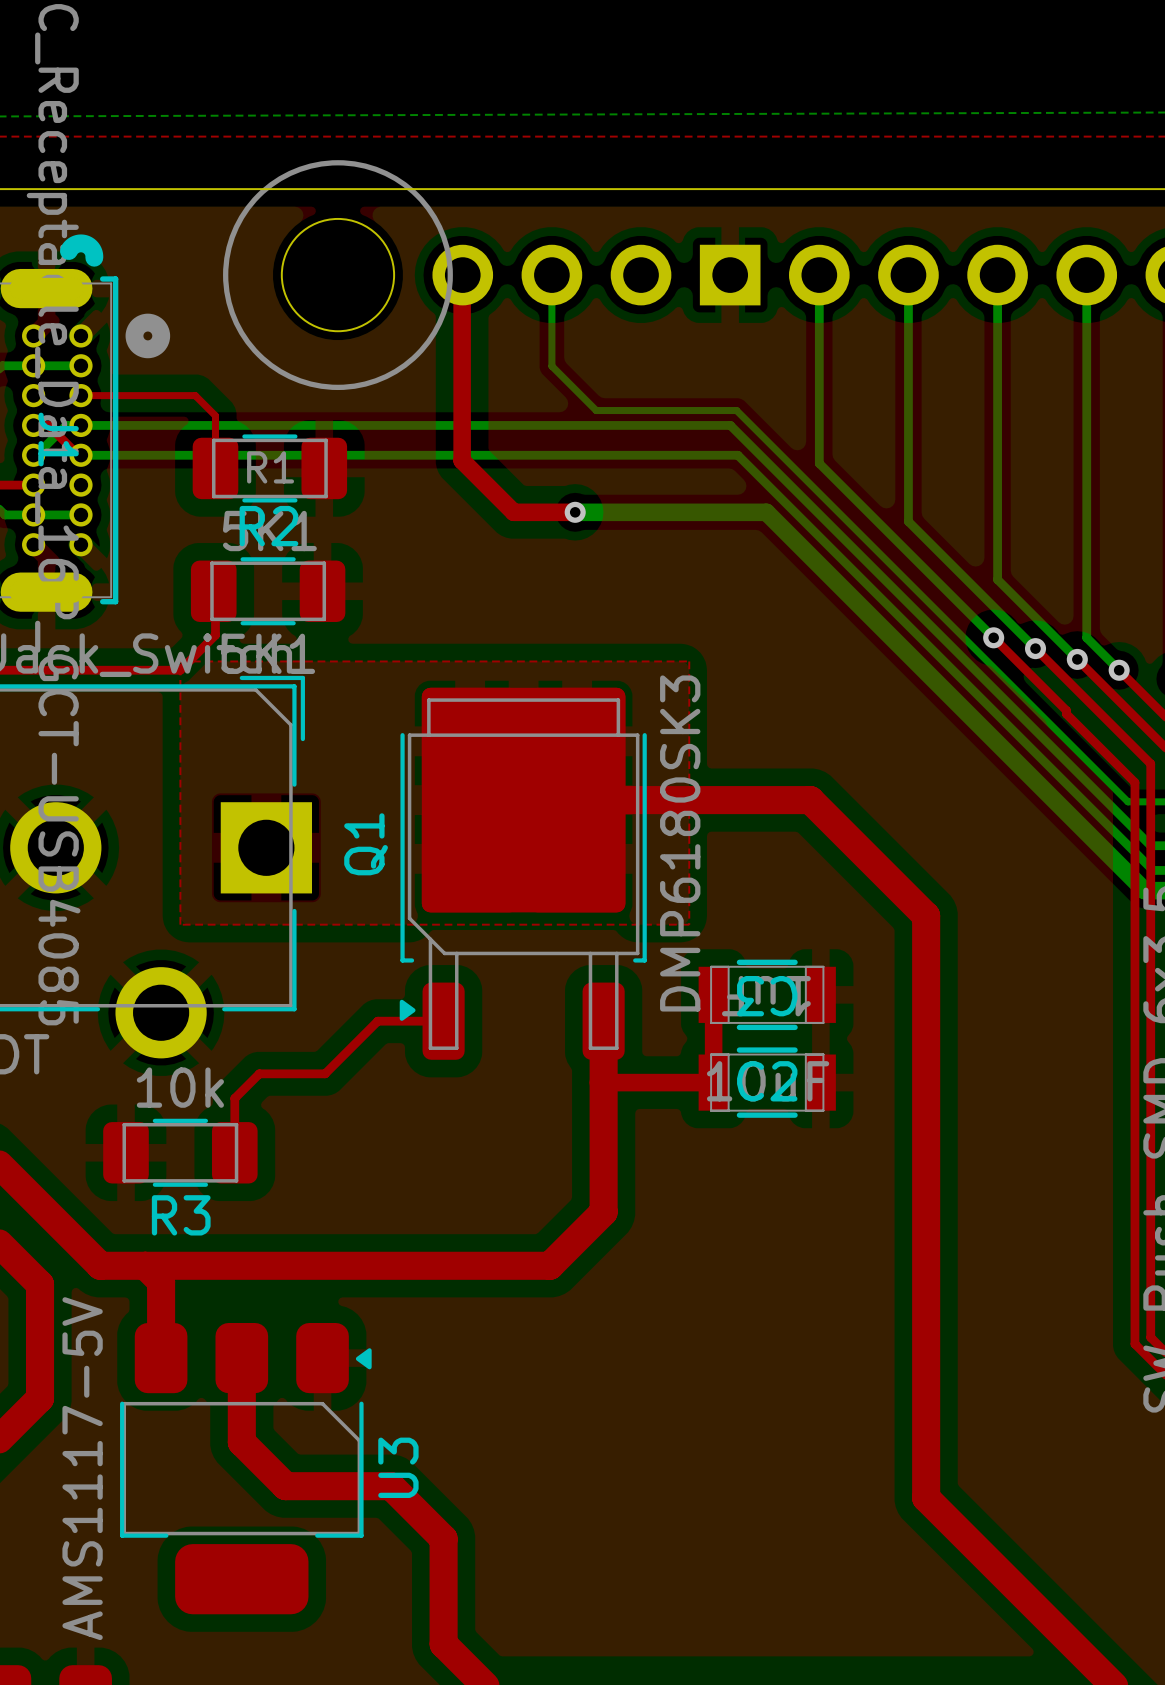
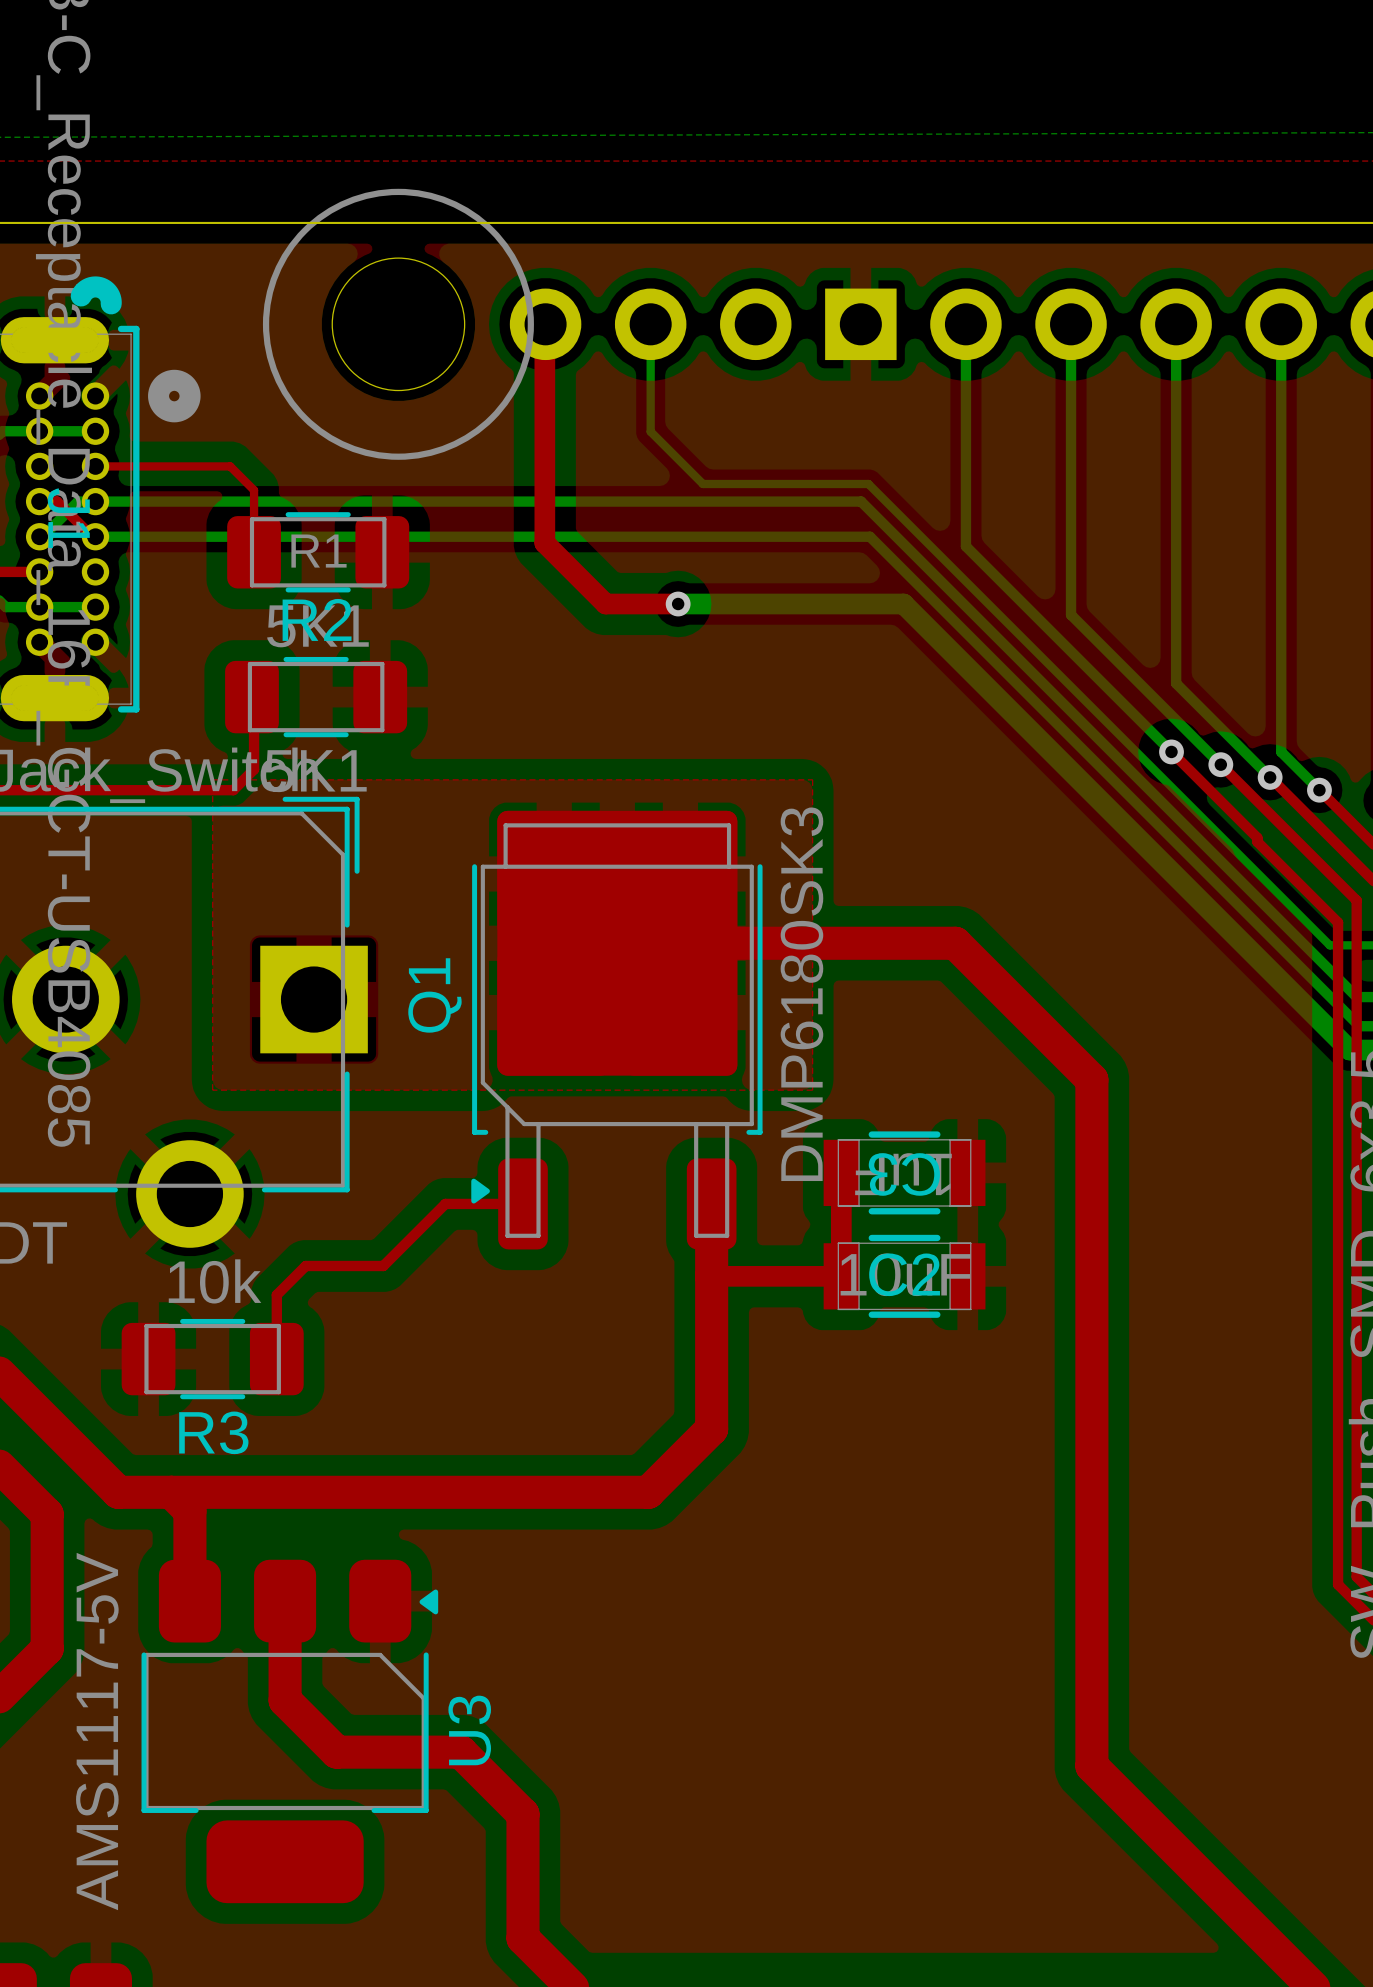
top track: (215, 635) (180, 670) -> (254, 748) (254, 769) (233, 790) (212, 790)

